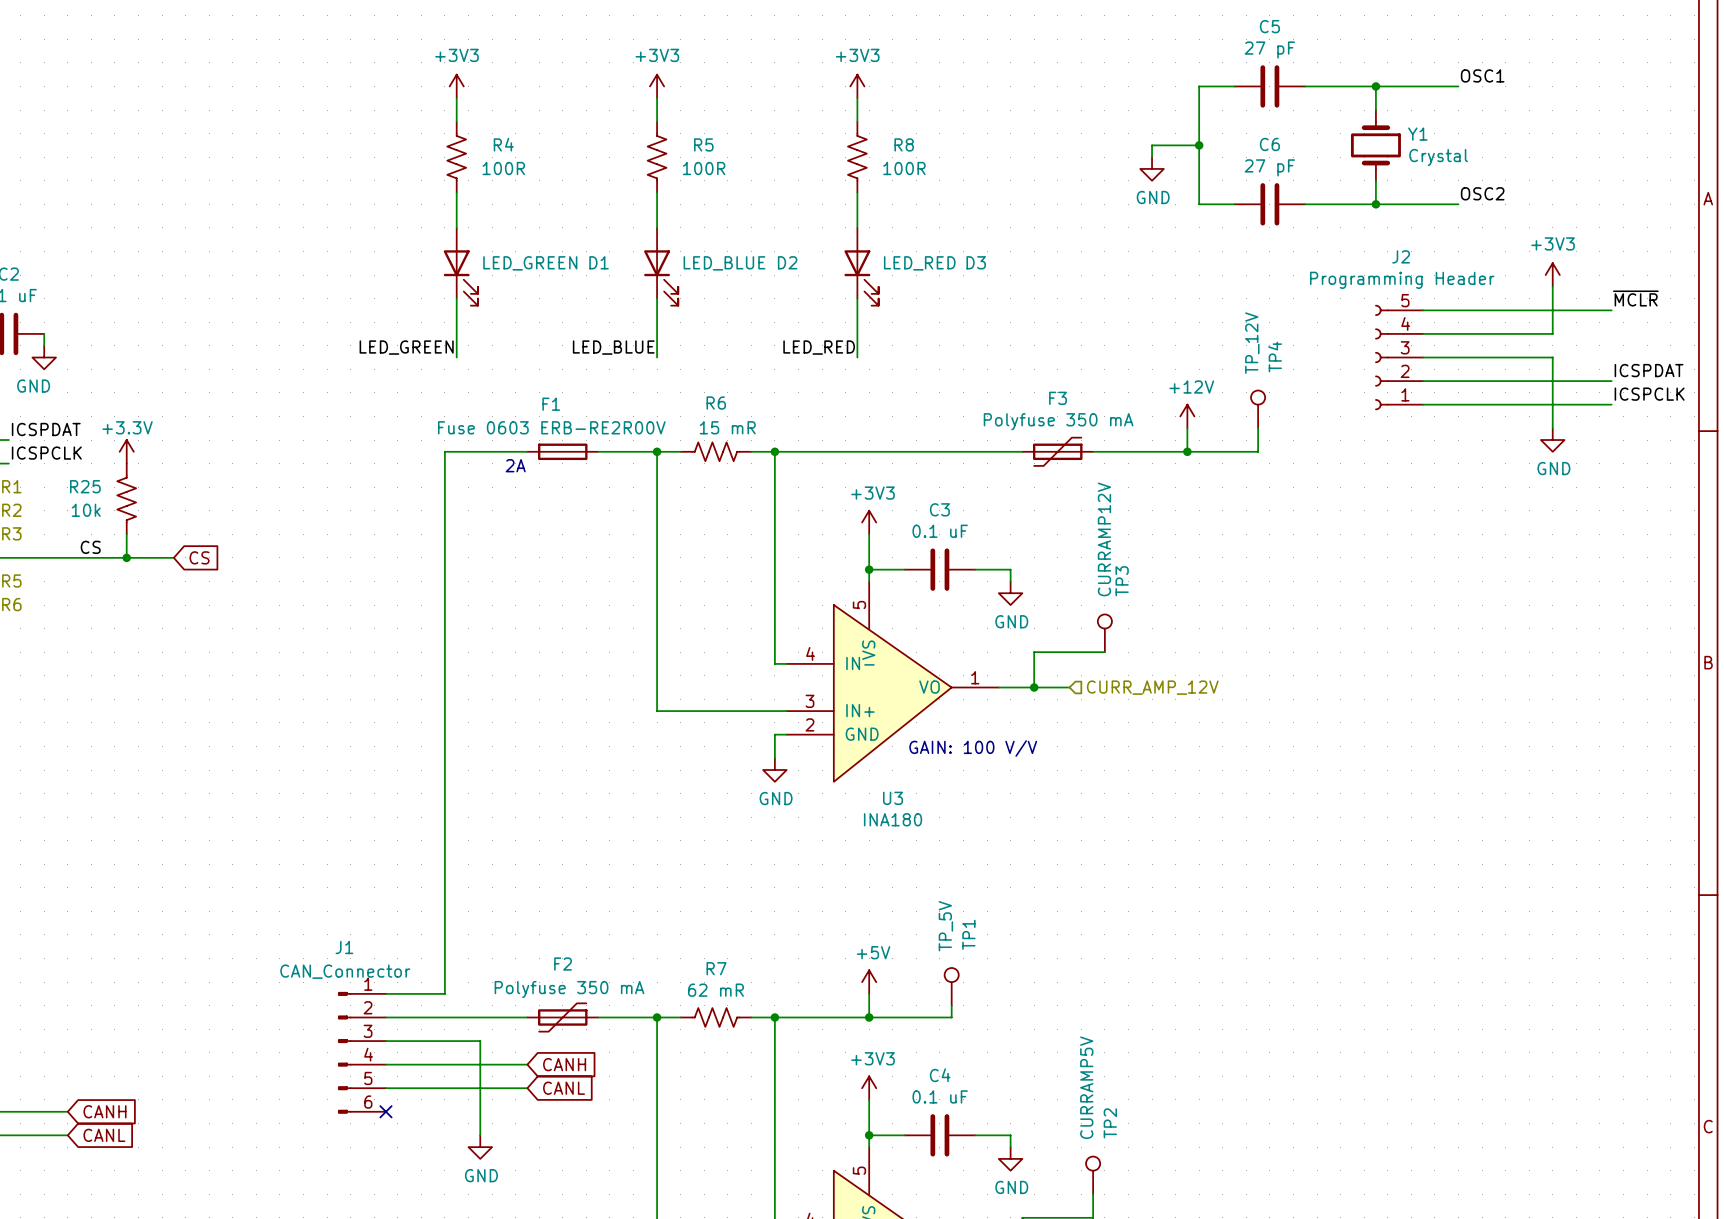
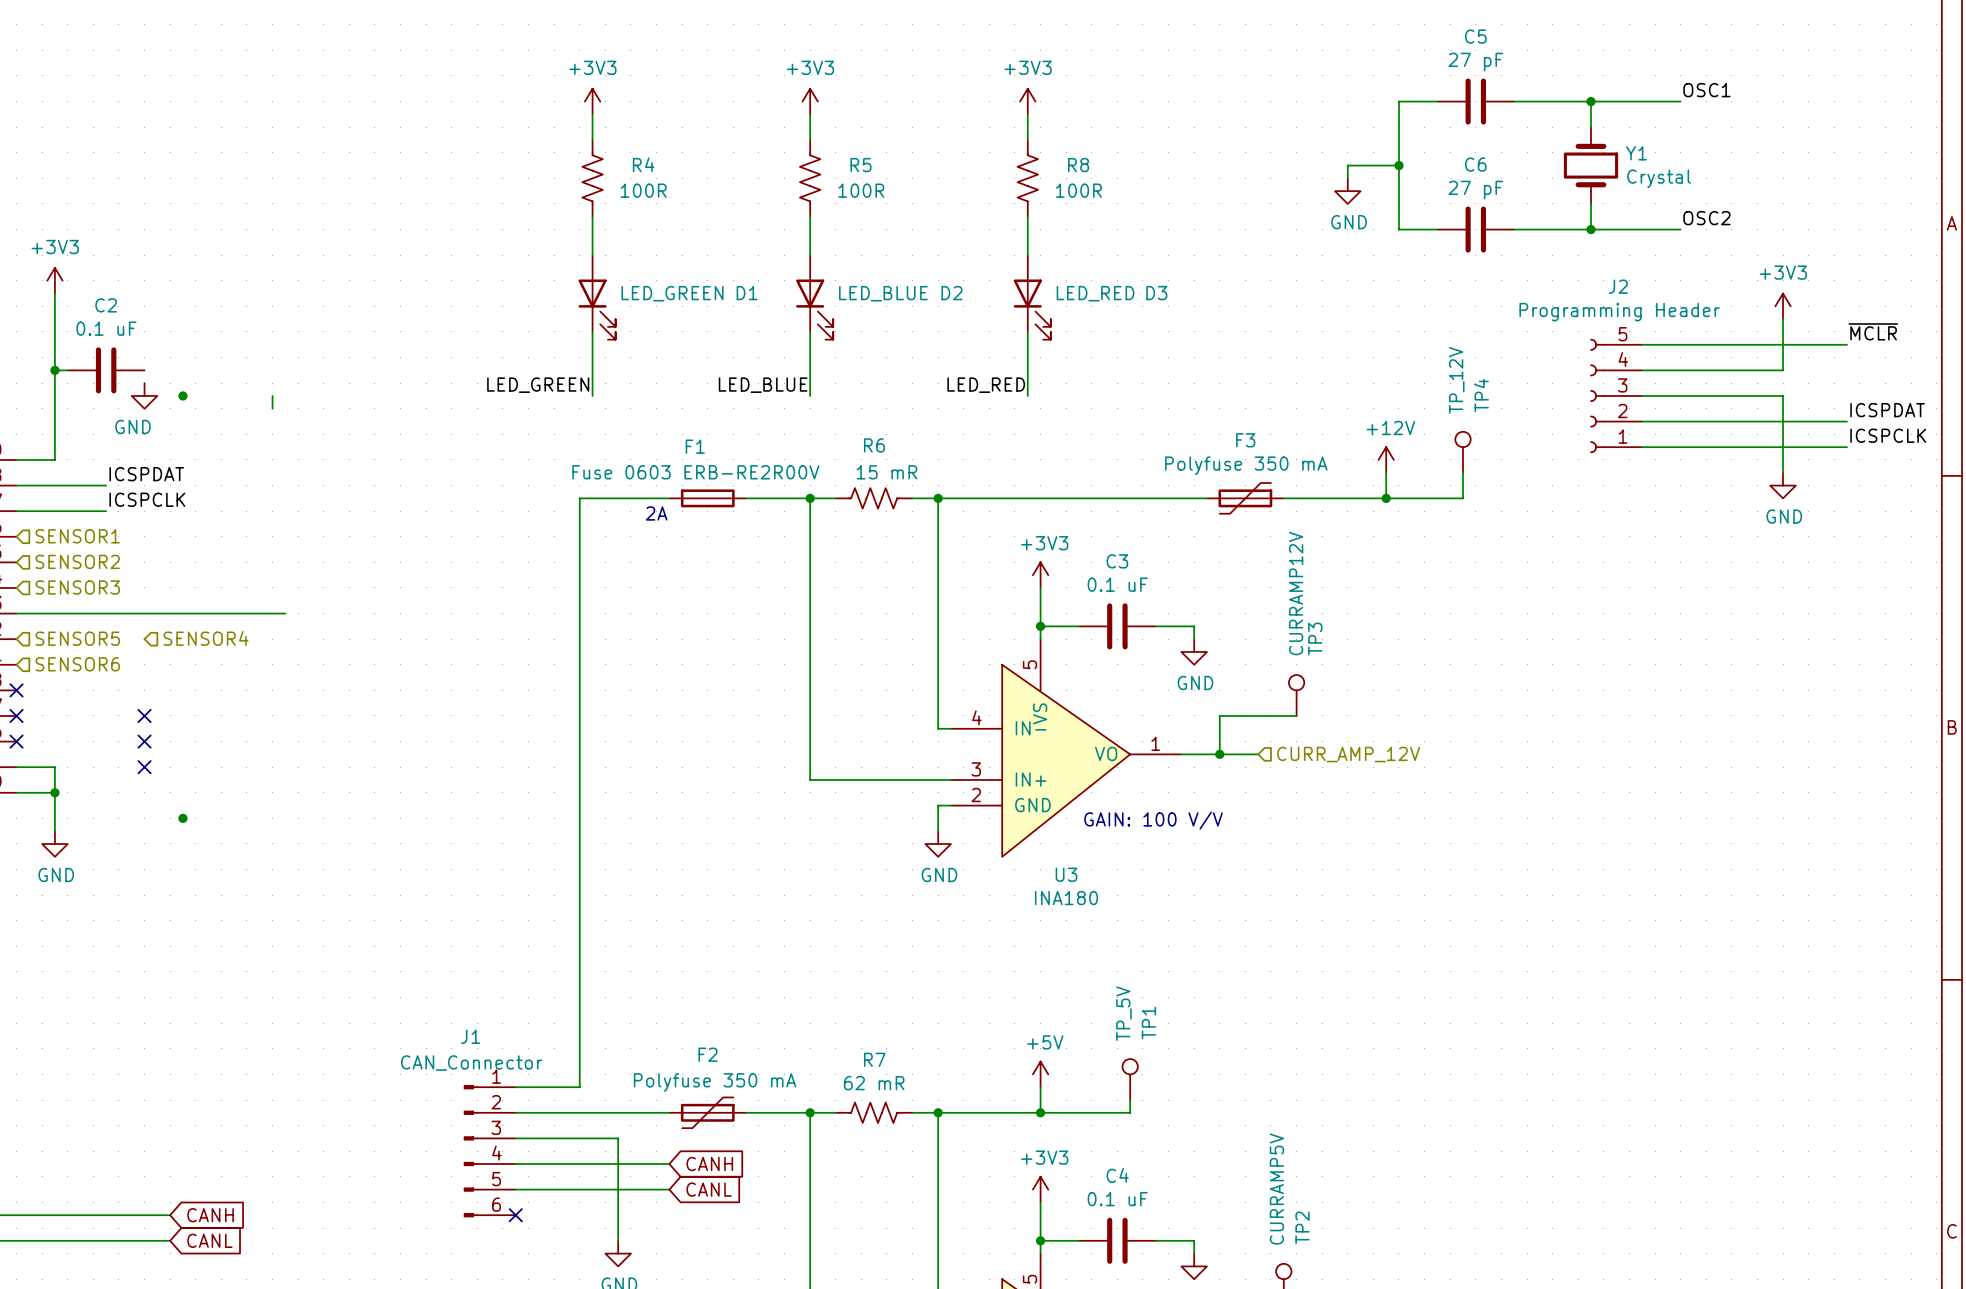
wire: (44, 333) (44, 345) -> (272, 395) (272, 408)
junction: none -> (182, 395)
power symbol: +3.3V (126, 451) -> none
R25: 10k (126, 498) -> none
wire: (126, 534) (126, 557) -> none
label: CS (90, 547) -> none
junction: (126, 557) -> none
global label: CS (199, 557) -> none
hierarchical label: none -> SENSOR4 (206, 638)
no-connect mark: none -> (144, 715)
no-connect mark: none -> (144, 741)
no-connect mark: none -> (144, 767)
junction: none -> (182, 818)

